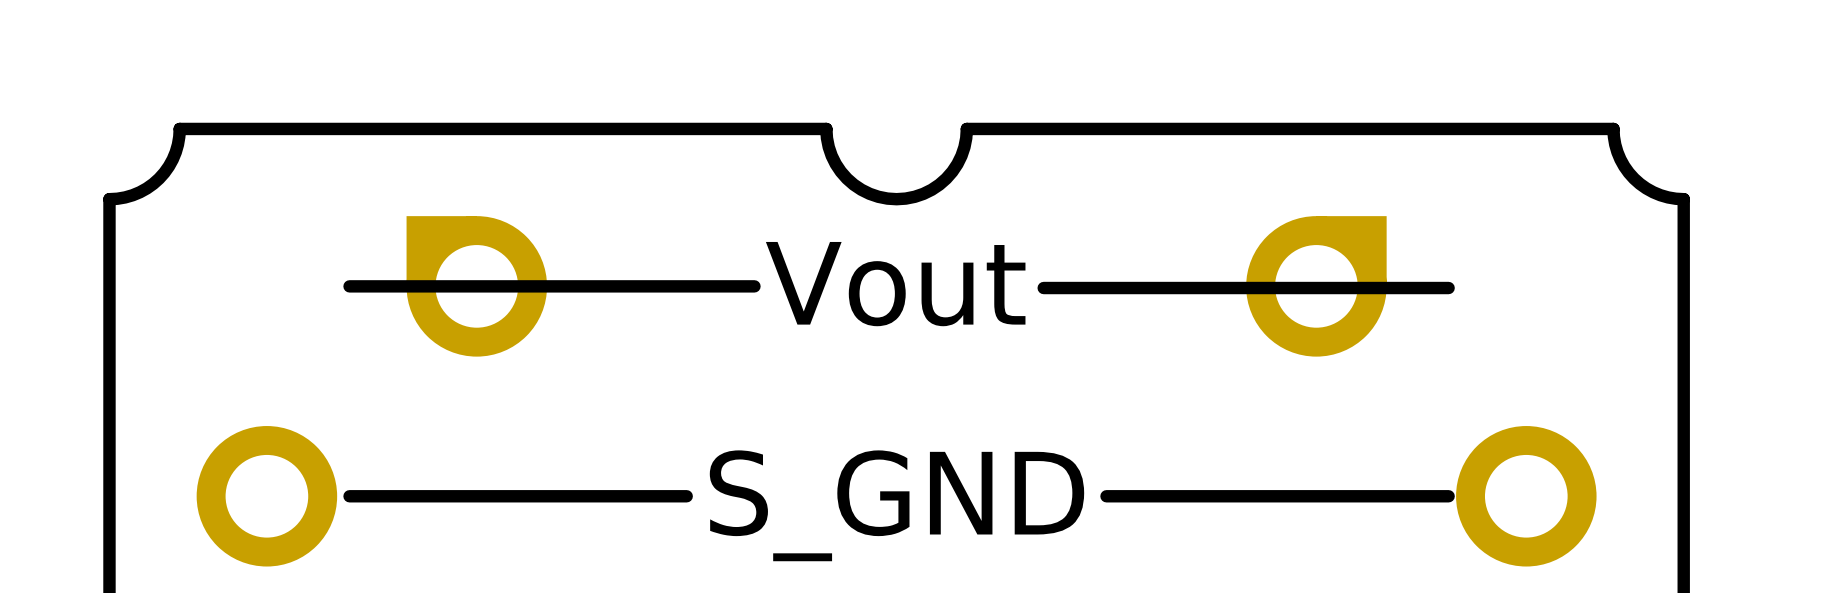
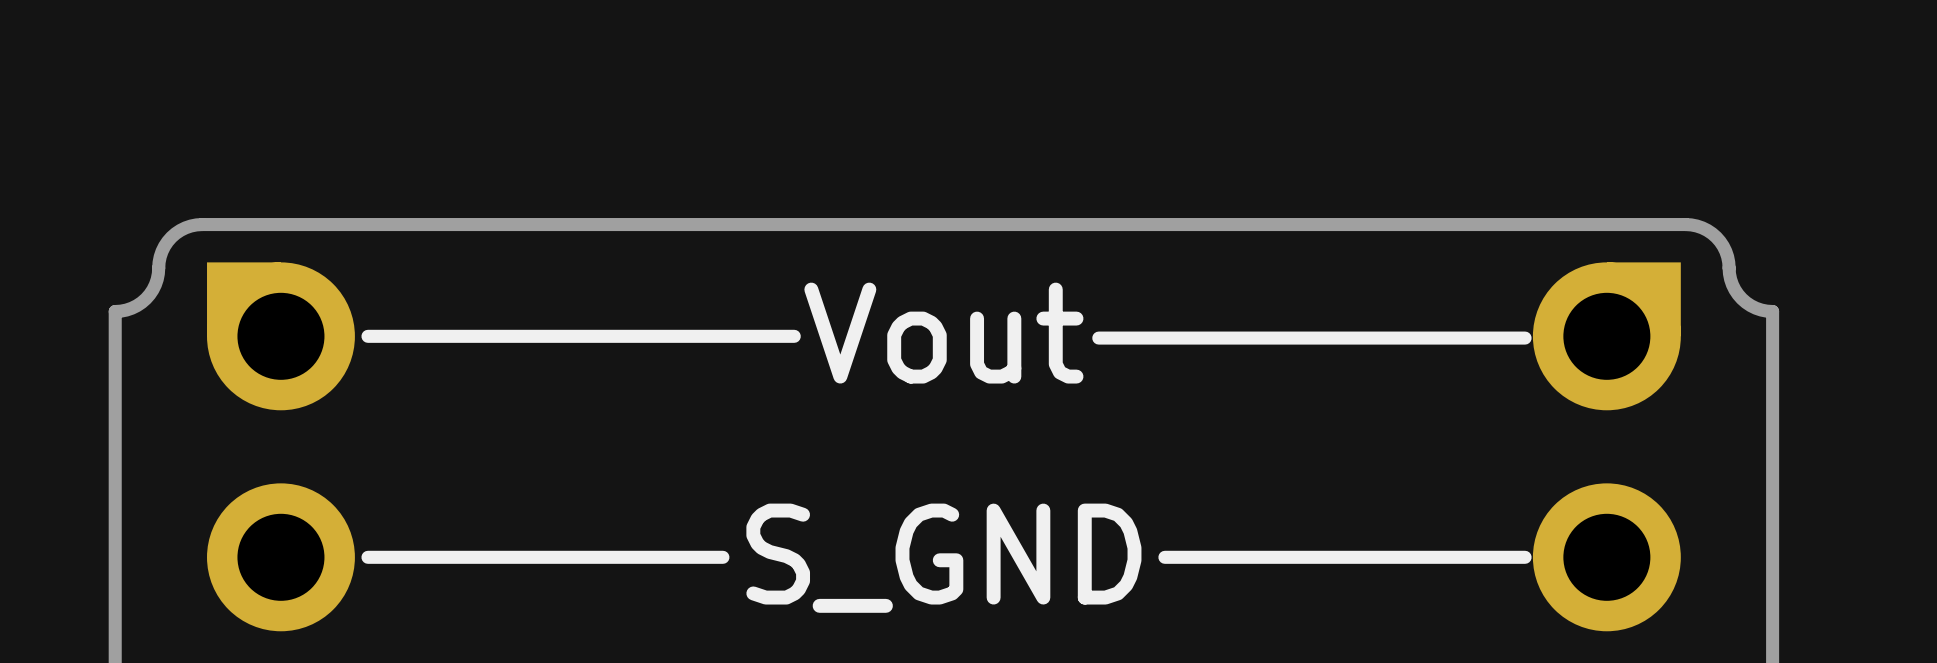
board edge: (109, 262) (109, 199) (132, 195) (146, 188) (159, 178) (172, 159) (177, 144) (179, 128) (826, 128) (831, 155) (846, 178) (869, 193) (896, 199) (923, 193) (946, 178) (961, 155) (966, 128) (1613, 128) (1615, 144) (1620, 159) (1634, 178) (1646, 188) (1660, 195) (1683, 199) (1683, 262) -> (115, 311) (131, 308) (145, 298) (155, 284) (160, 256) (167, 241) (185, 227) (202, 224) (1685, 224) (1707, 230) (1720, 241) (1727, 256) (1732, 284) (1741, 298) (1755, 308) (1772, 311)
part position: (476, 286) -> (280, 336)
part position: (1316, 286) -> (1606, 336)

